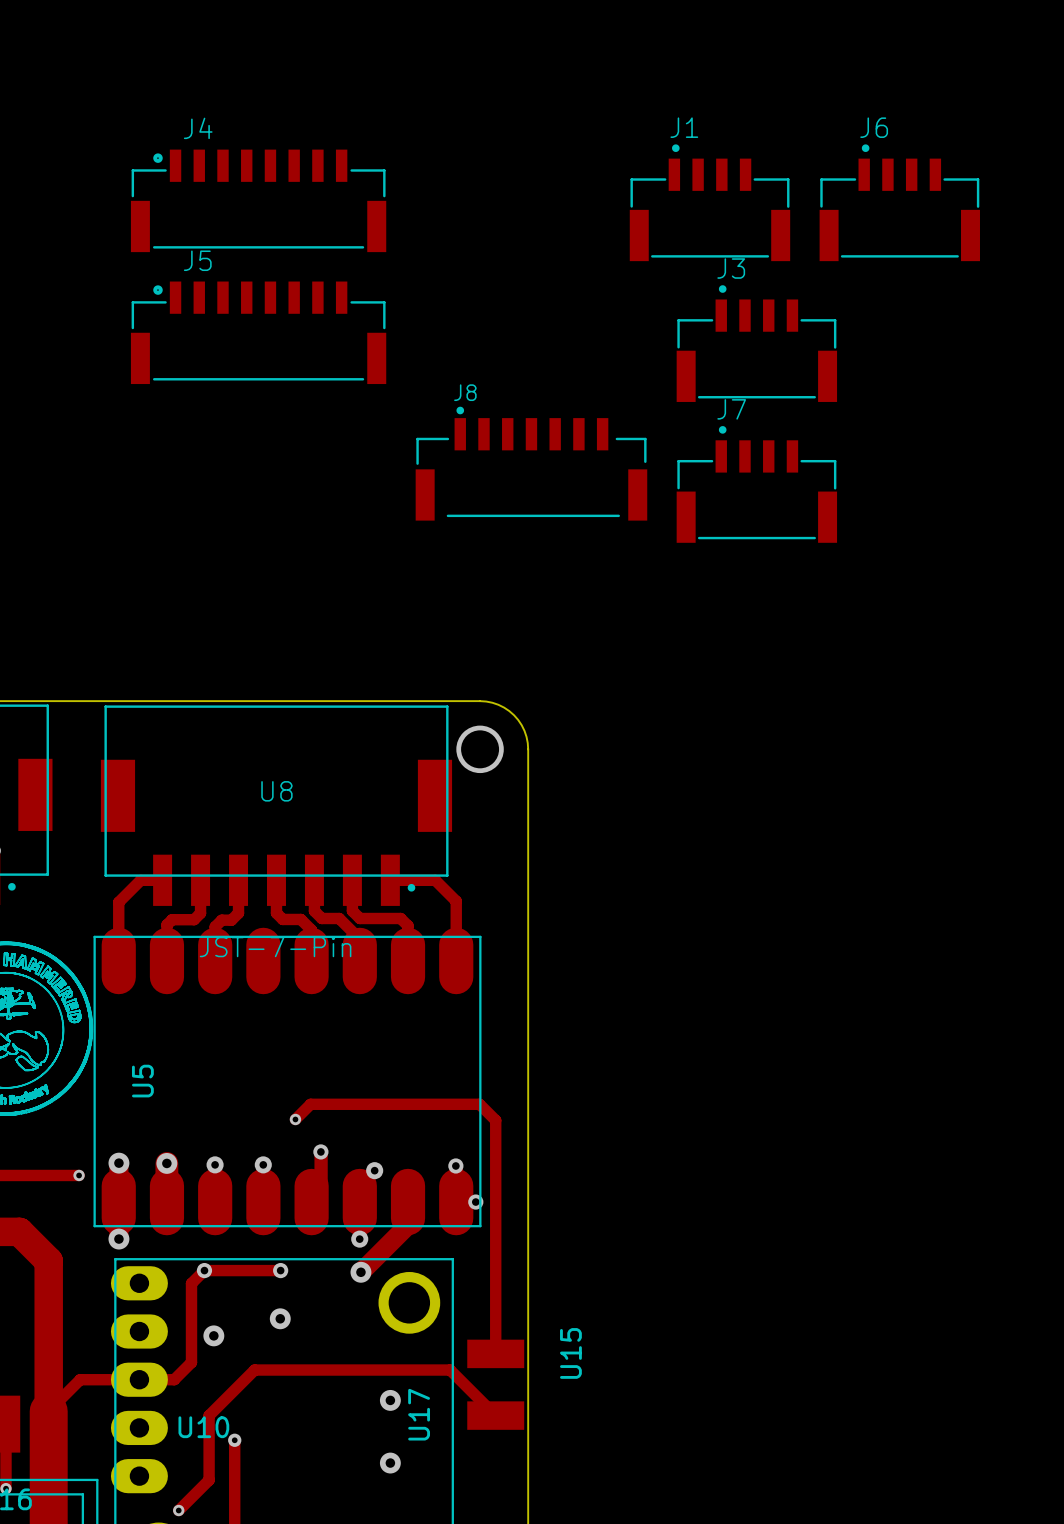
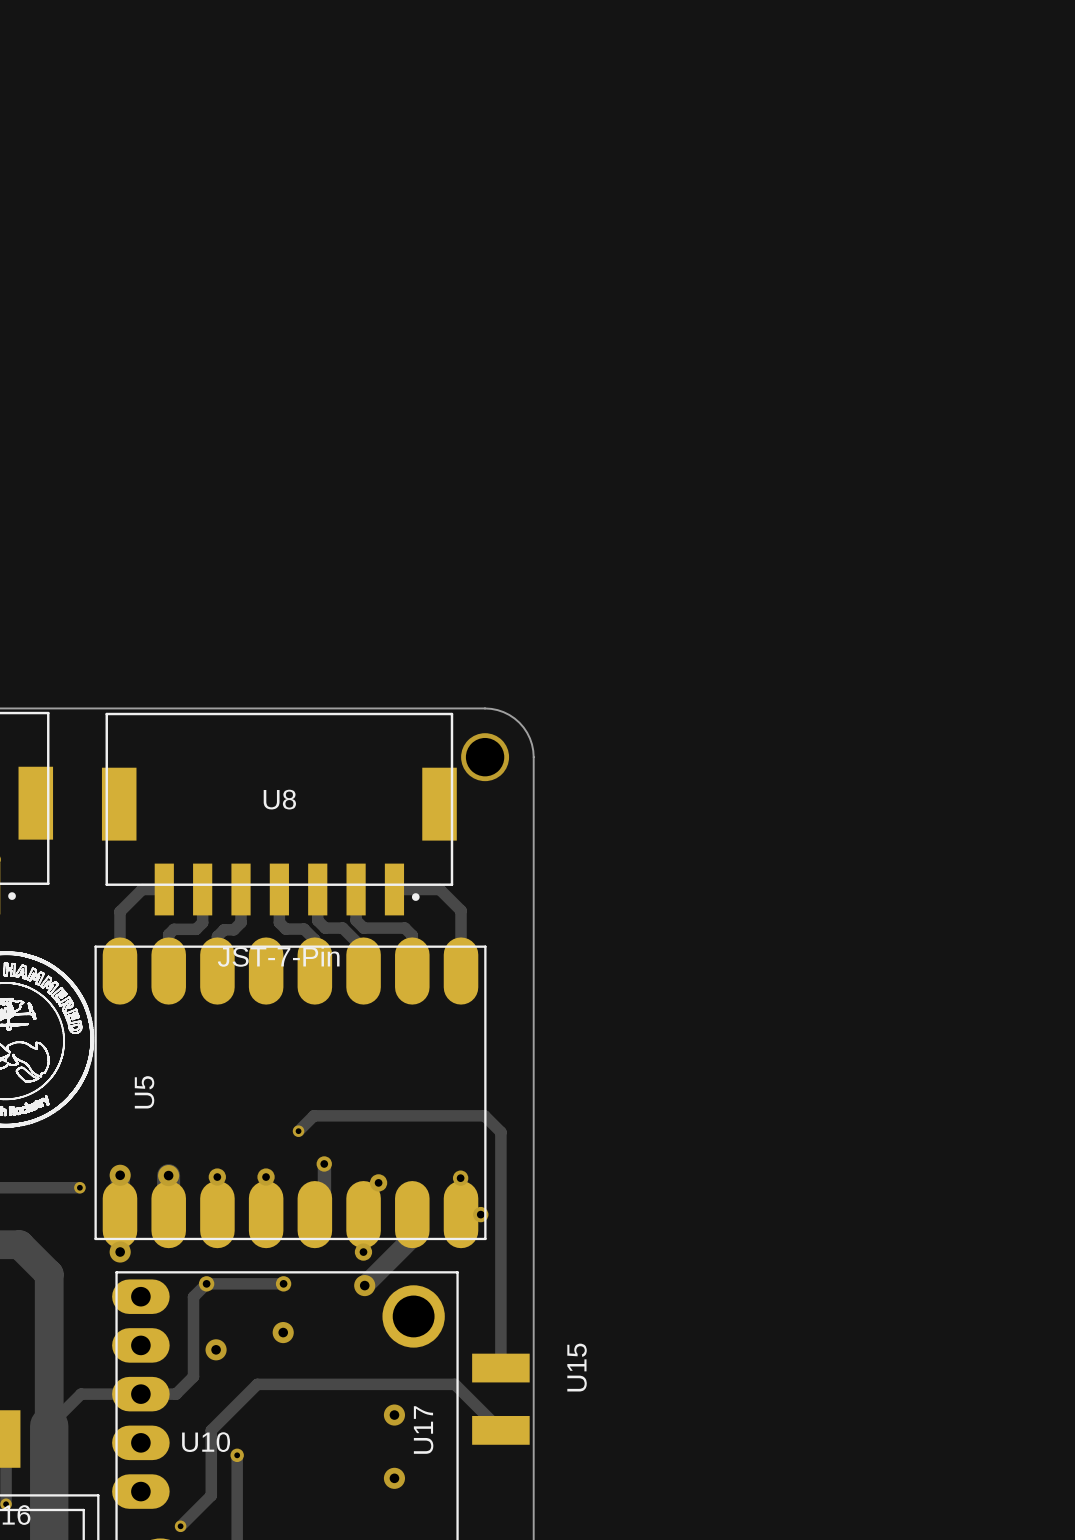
J4: (258, 200) -> none
J1: (709, 202) -> none
J6: (899, 202) -> none
J5: (258, 332) -> none
J3: (756, 343) -> none
J8: (531, 463) -> none
J7: (756, 484) -> none

